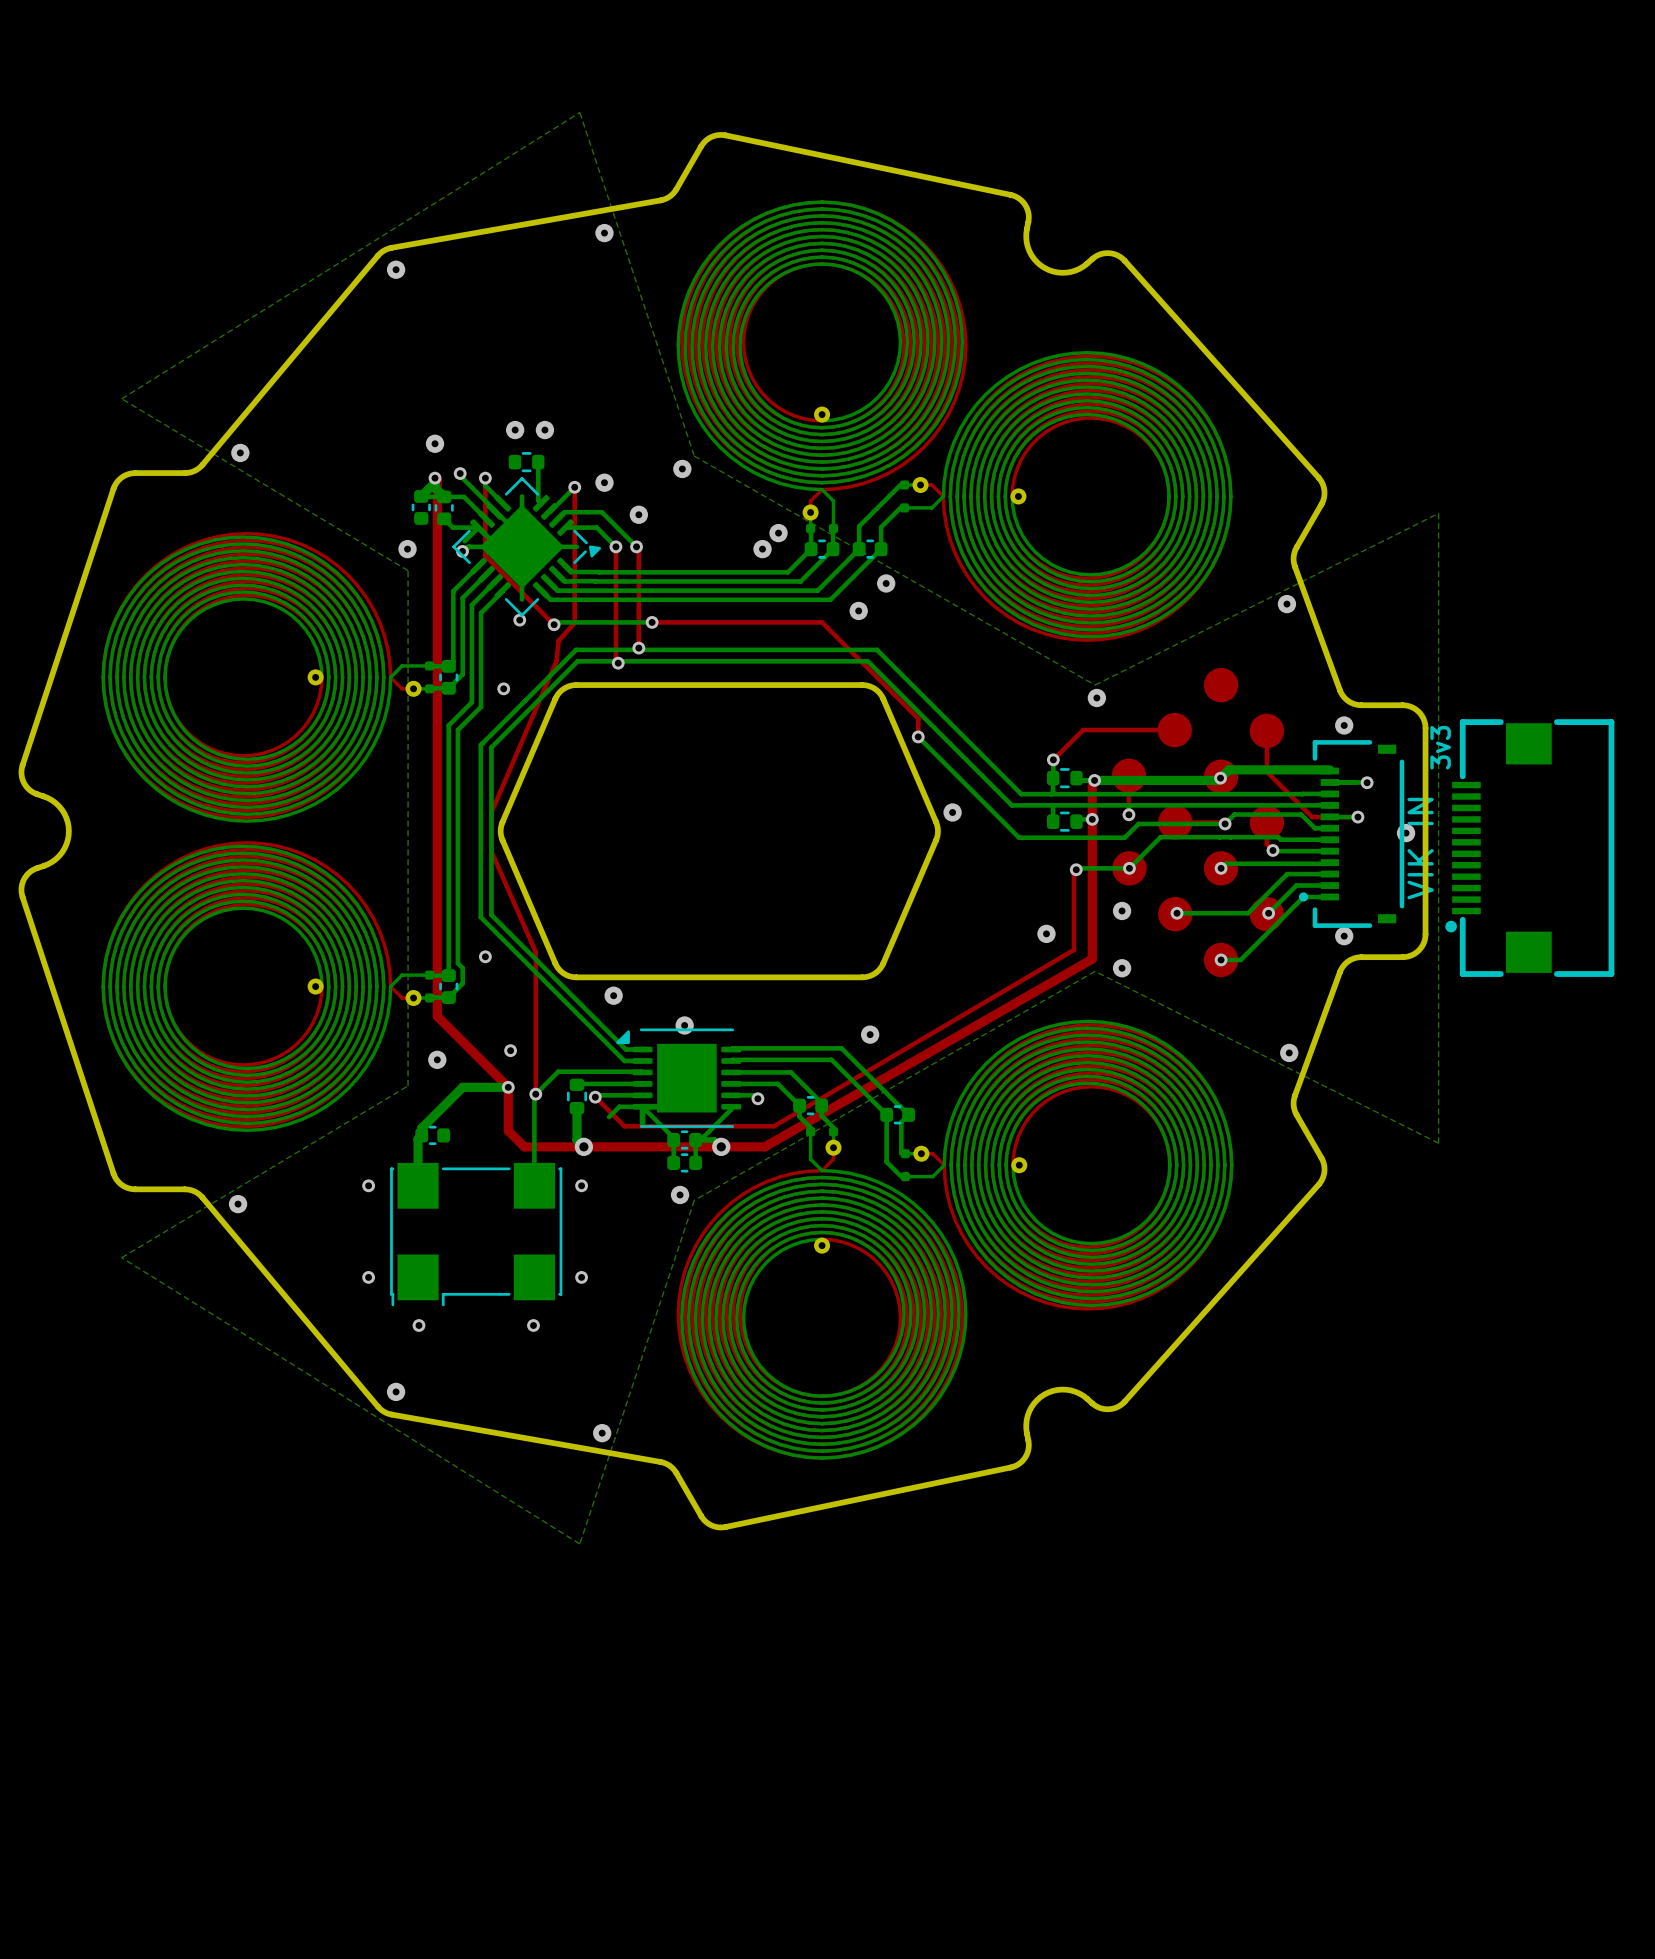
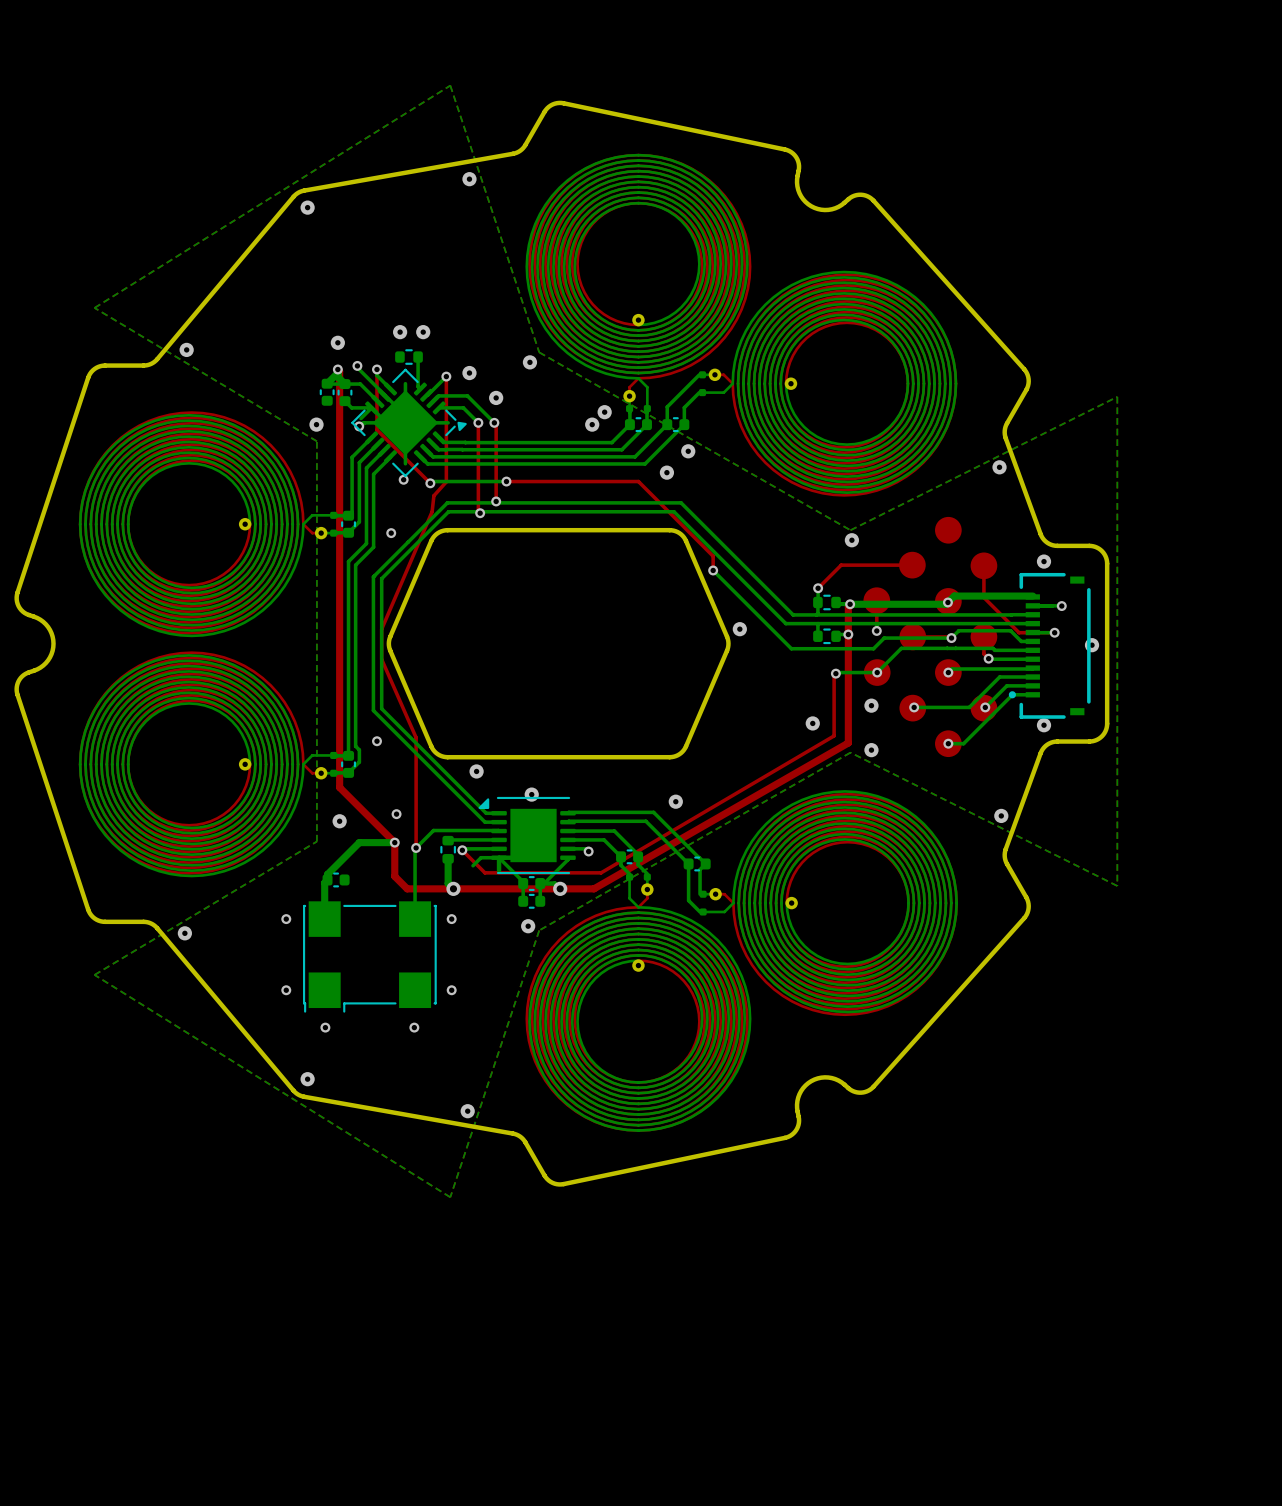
part: (1529, 848) -> none

